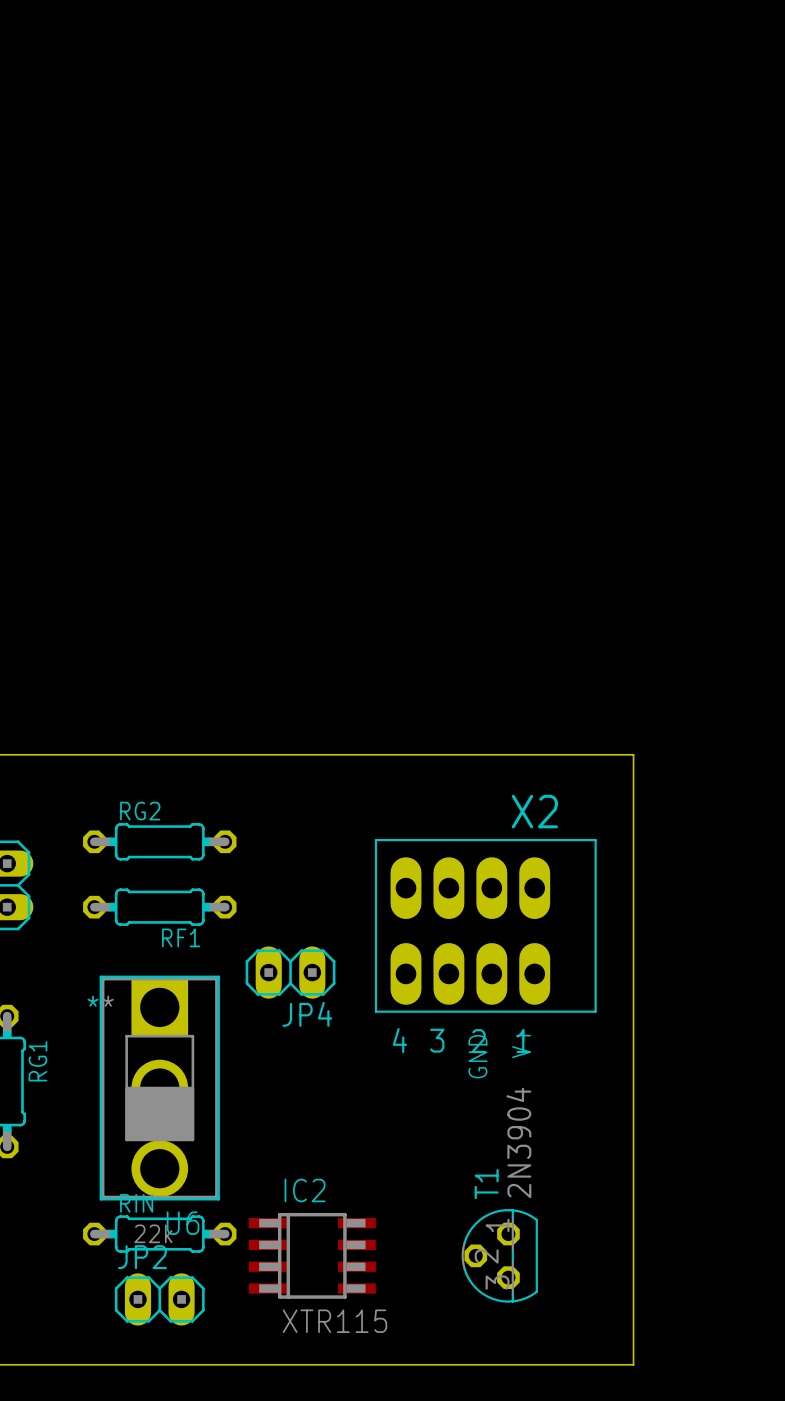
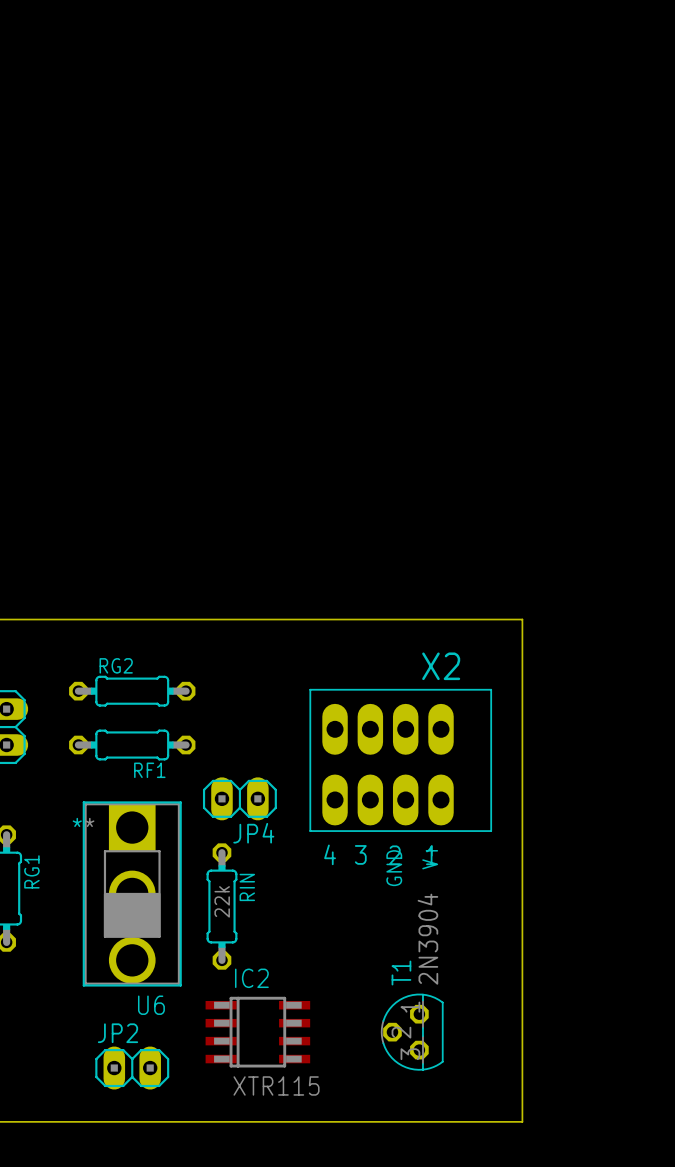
RIN rotation: 0° (159, 1234) -> 90° clockwise (221, 906)
RIN position: (159, 1234) -> (221, 906)

